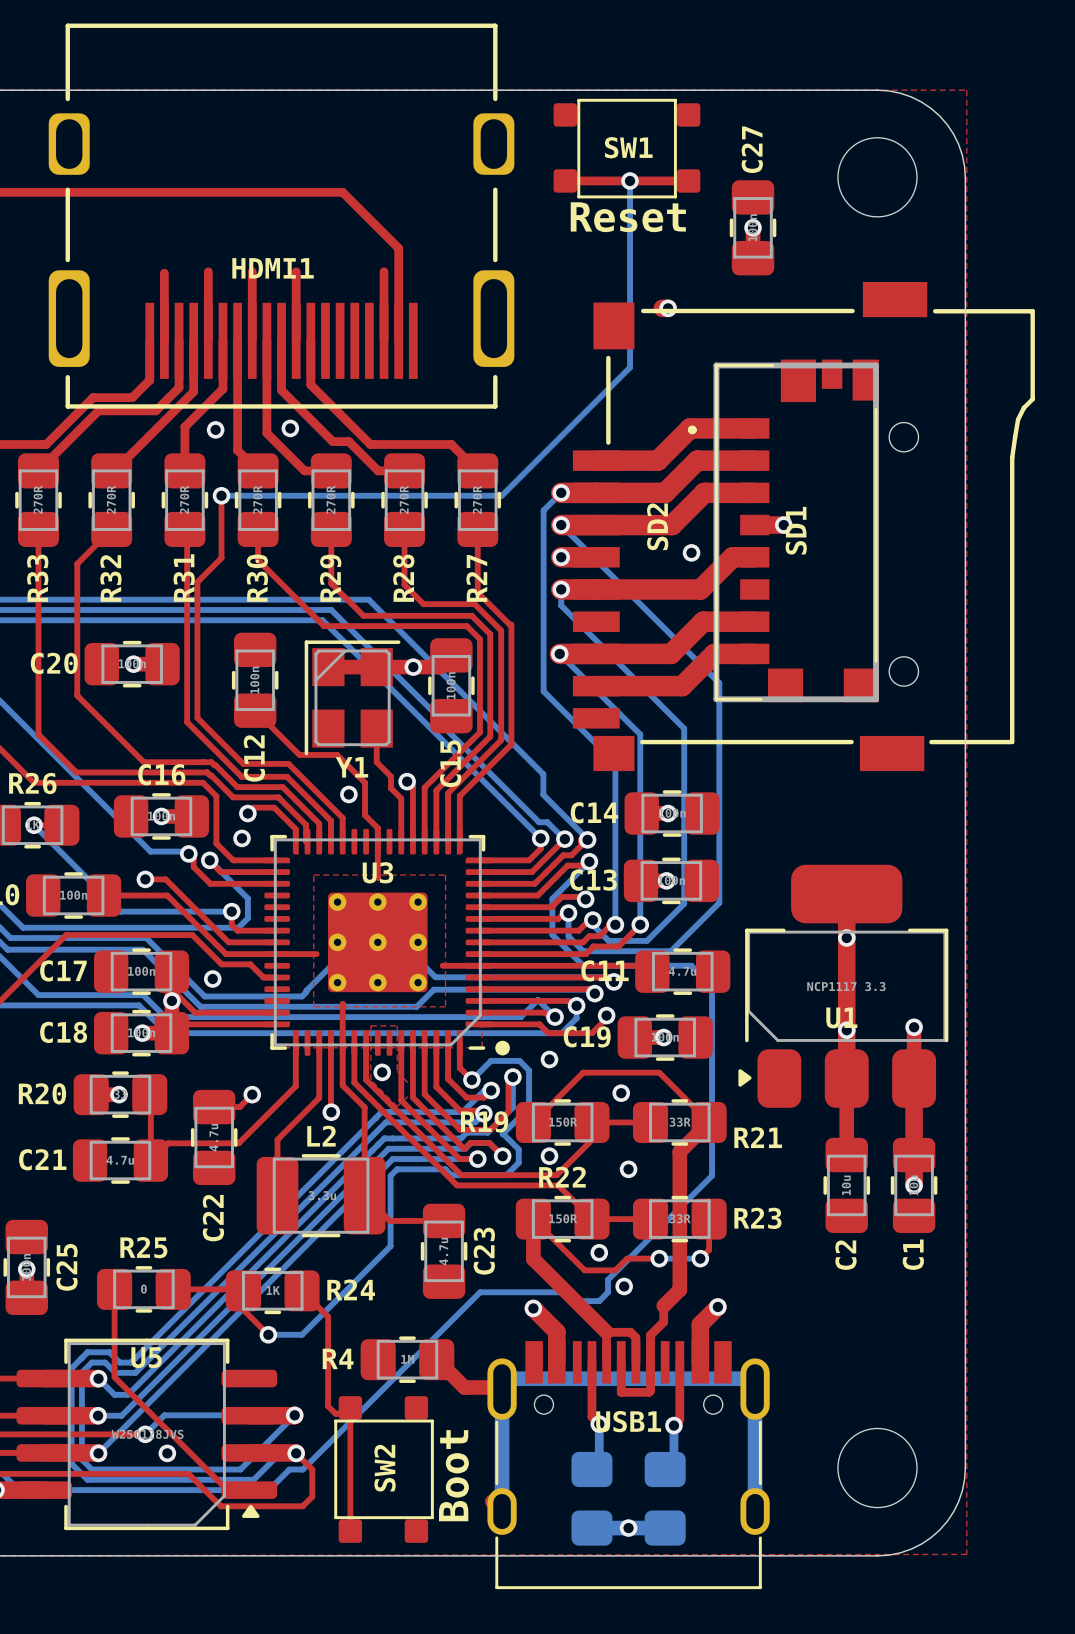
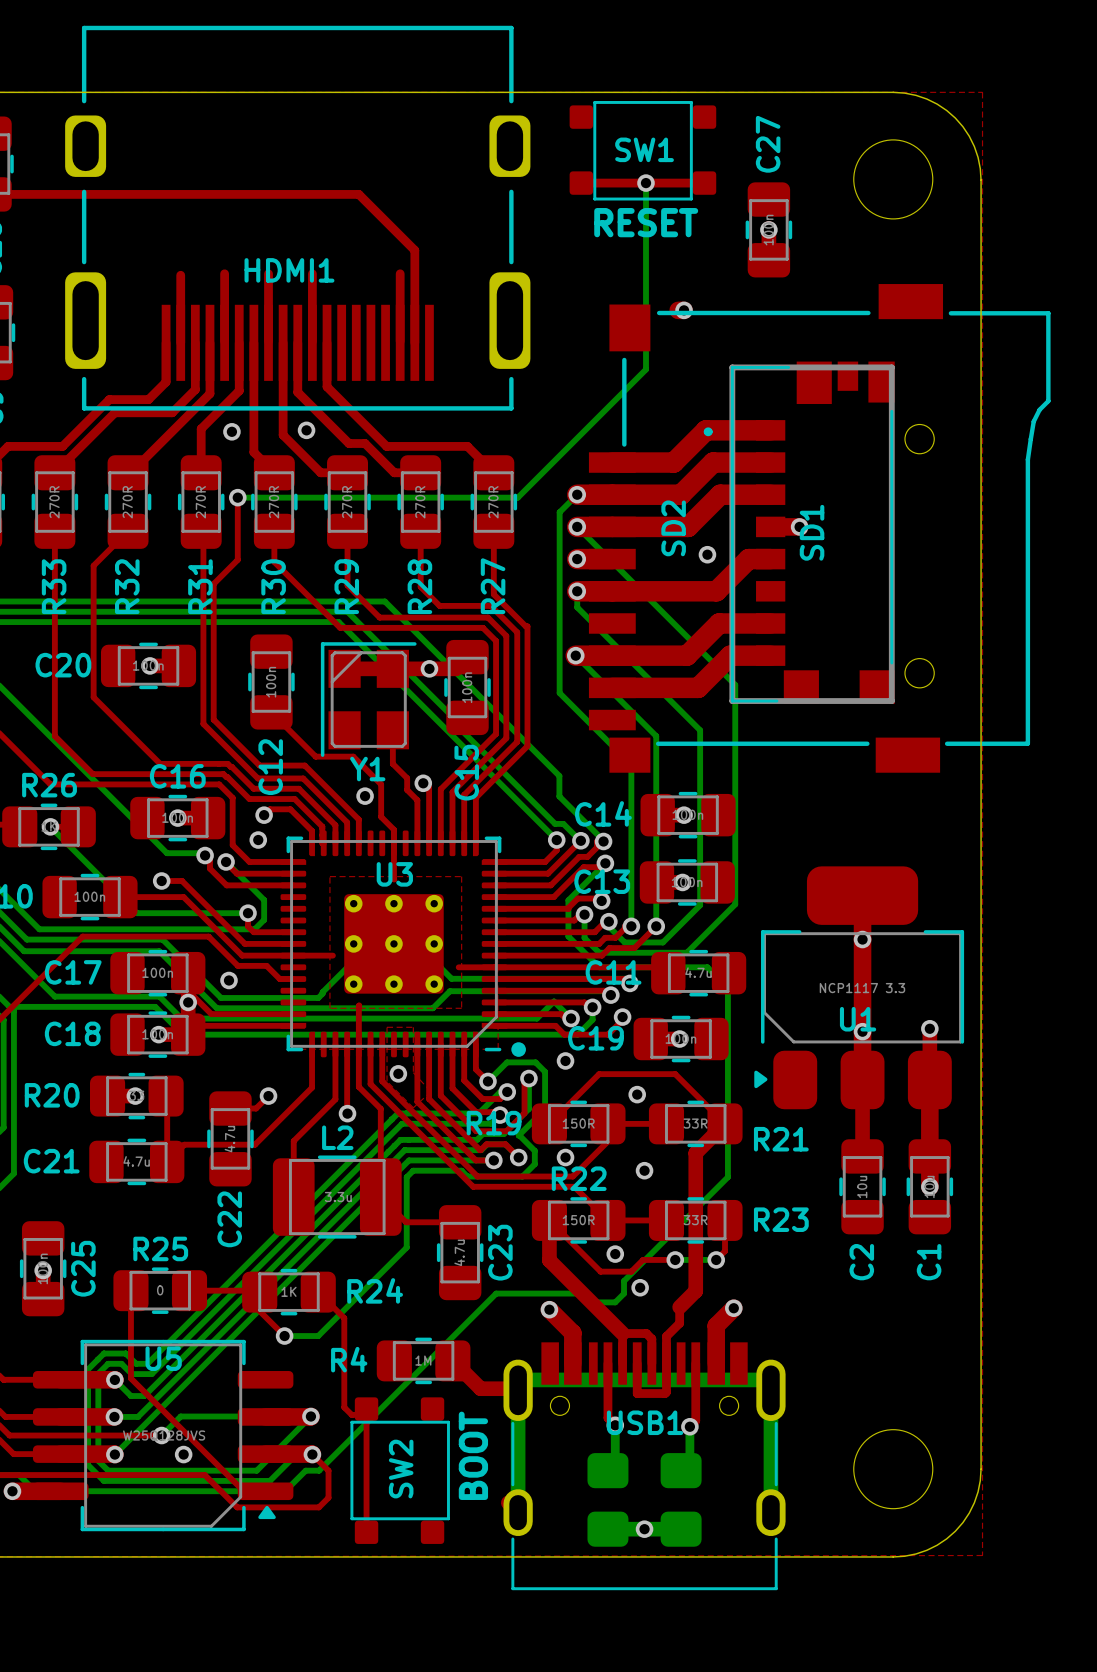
text: Reset (628, 217) -> RESET (646, 222)
text: Boot (453, 1475) -> BOOT (473, 1455)

